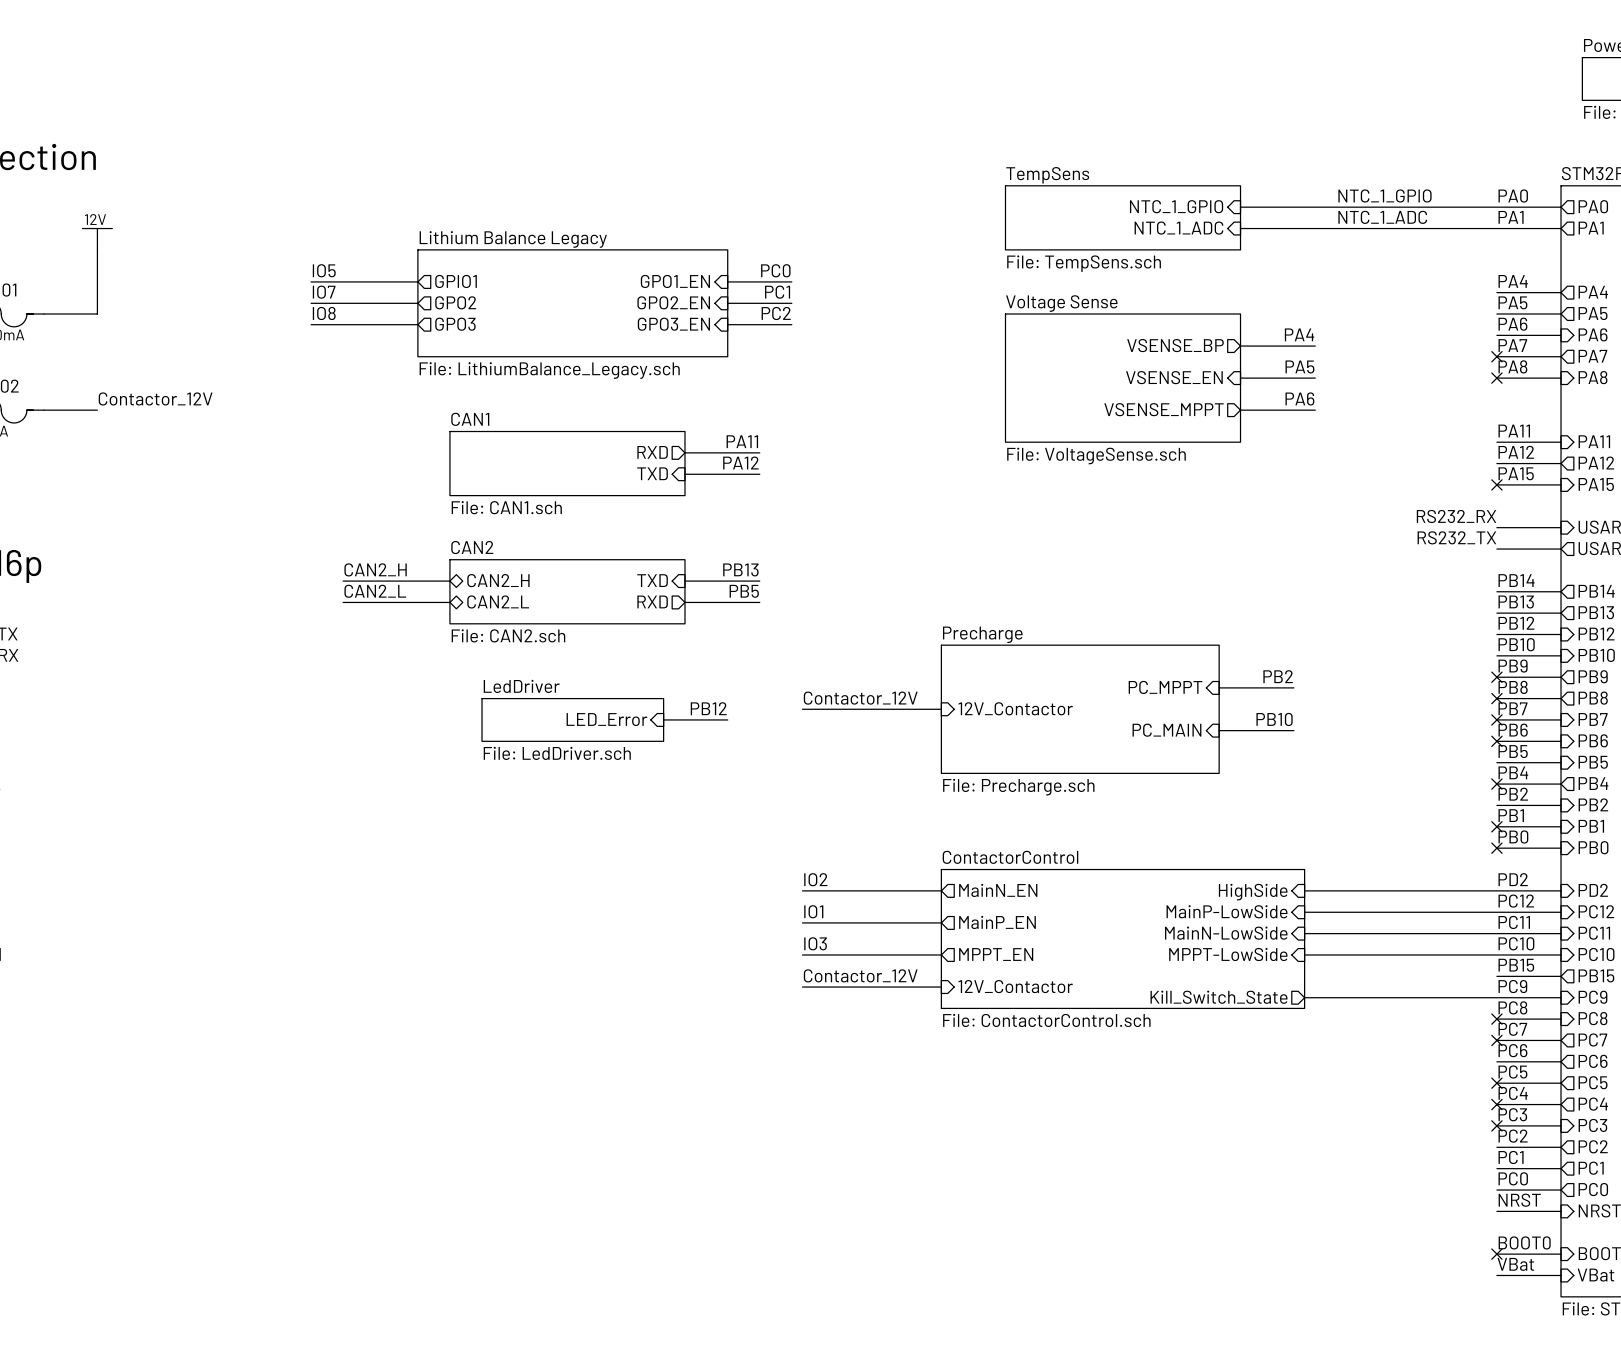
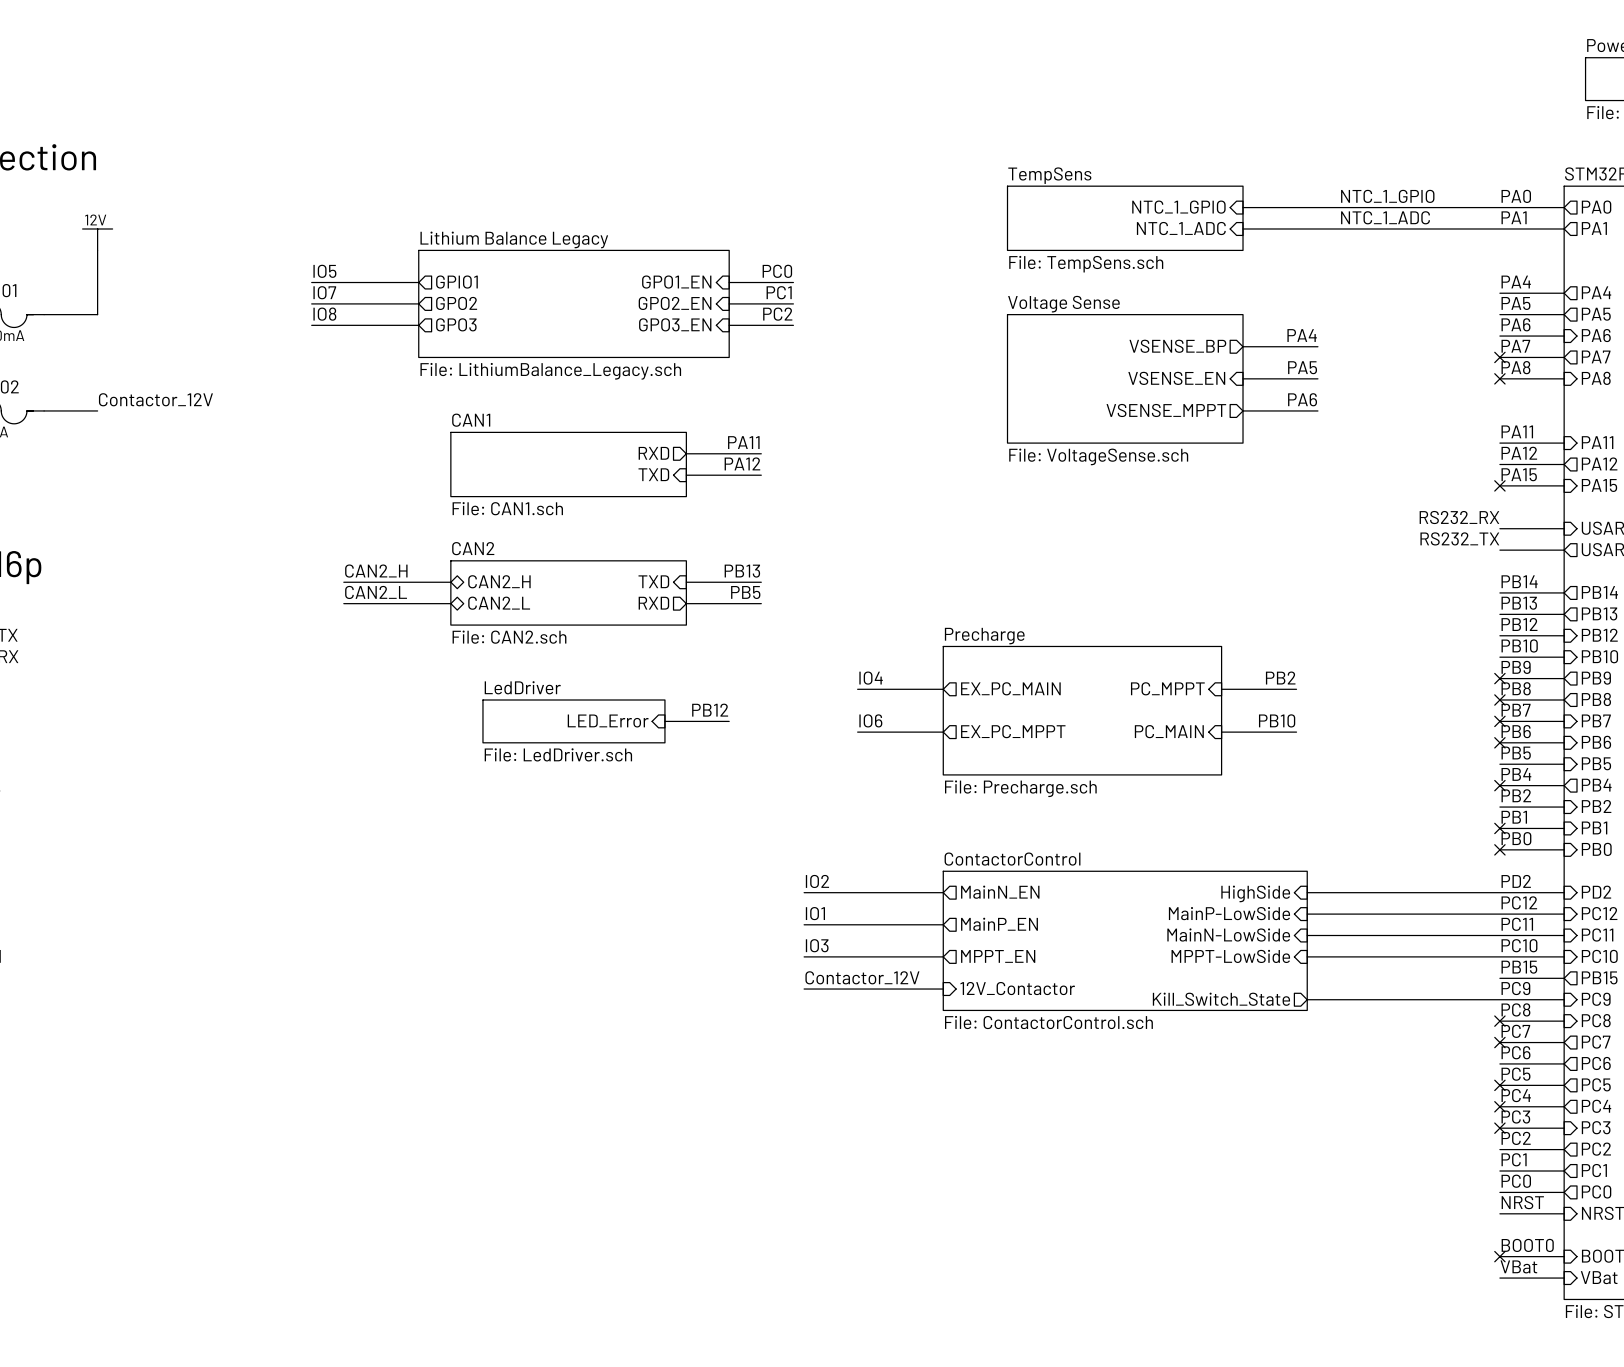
label: none -> IO4 (871, 678)
wire: none -> (857, 689) (943, 689)
sheet pin: none -> EX_PC_MAIN (1010, 688)
label: Contactor_12V (860, 698) -> none
sheet pin: 12V_Contactor (1015, 708) -> none
wire: (802, 709) (941, 709) -> none
label: none -> IO6 (870, 720)
wire: none -> (857, 732) (943, 732)
sheet pin: none -> EX_PC_MPPT (1013, 731)

